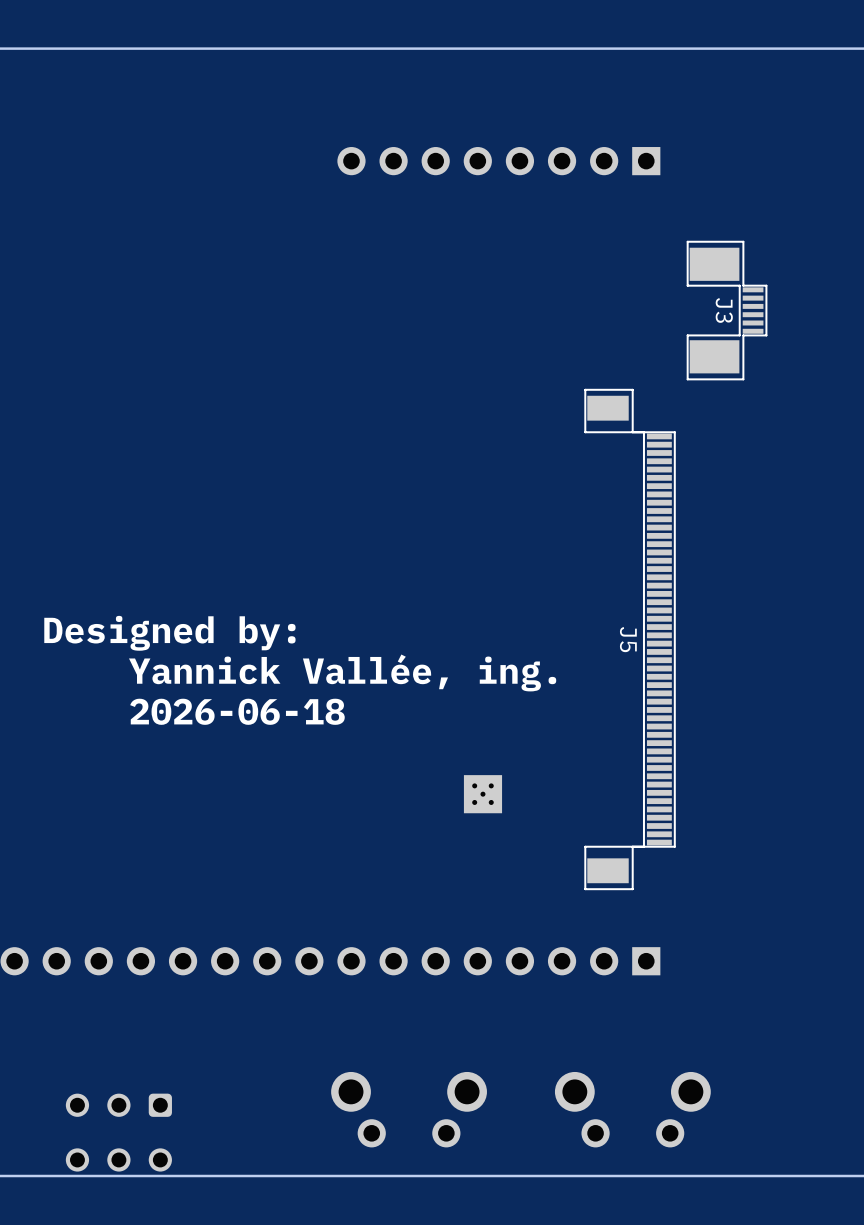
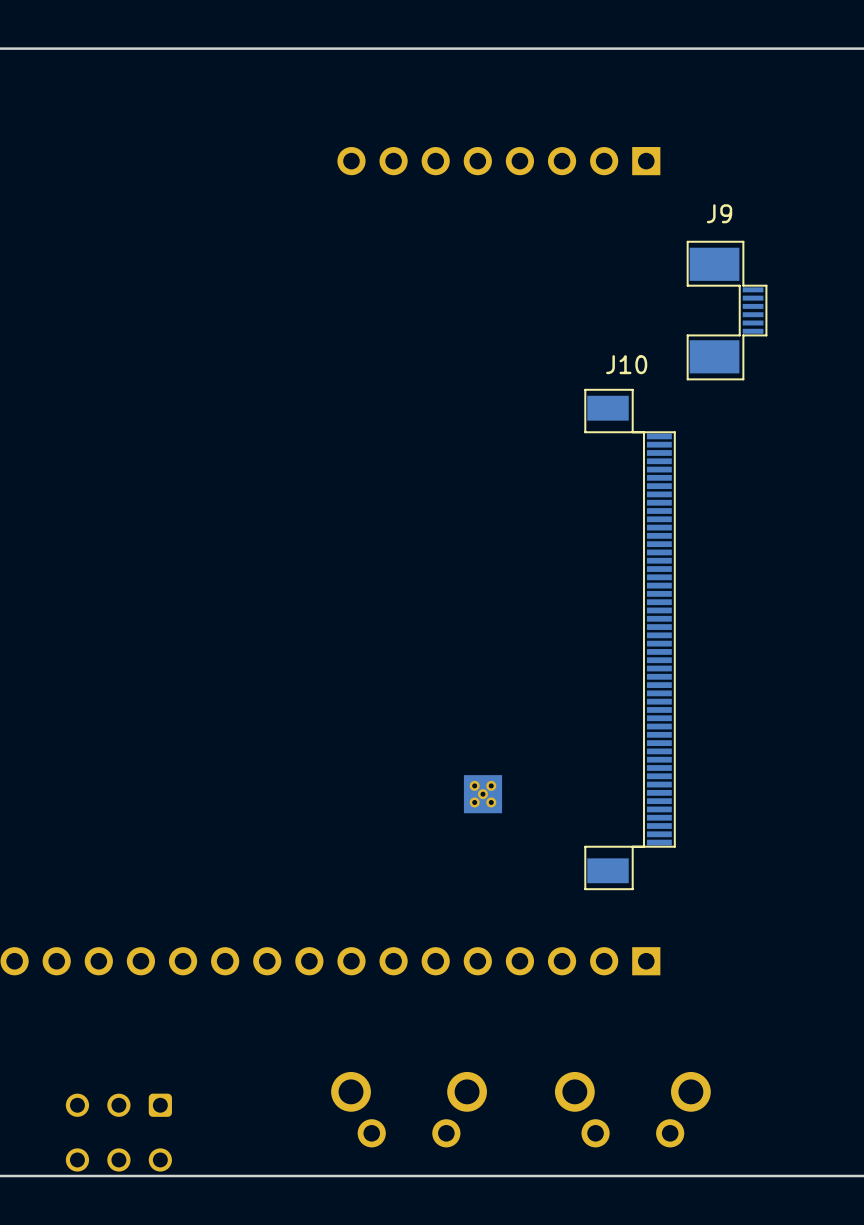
J3 name: J3 (724, 310) -> J9 (719, 213)
text: Designed by: (169, 633) -> none
J5 name: J5 (628, 639) -> J10 (626, 364)
text: Yannick Vallée, ing. (342, 672) -> none
text: 2026-06-18 (237, 711) -> none

